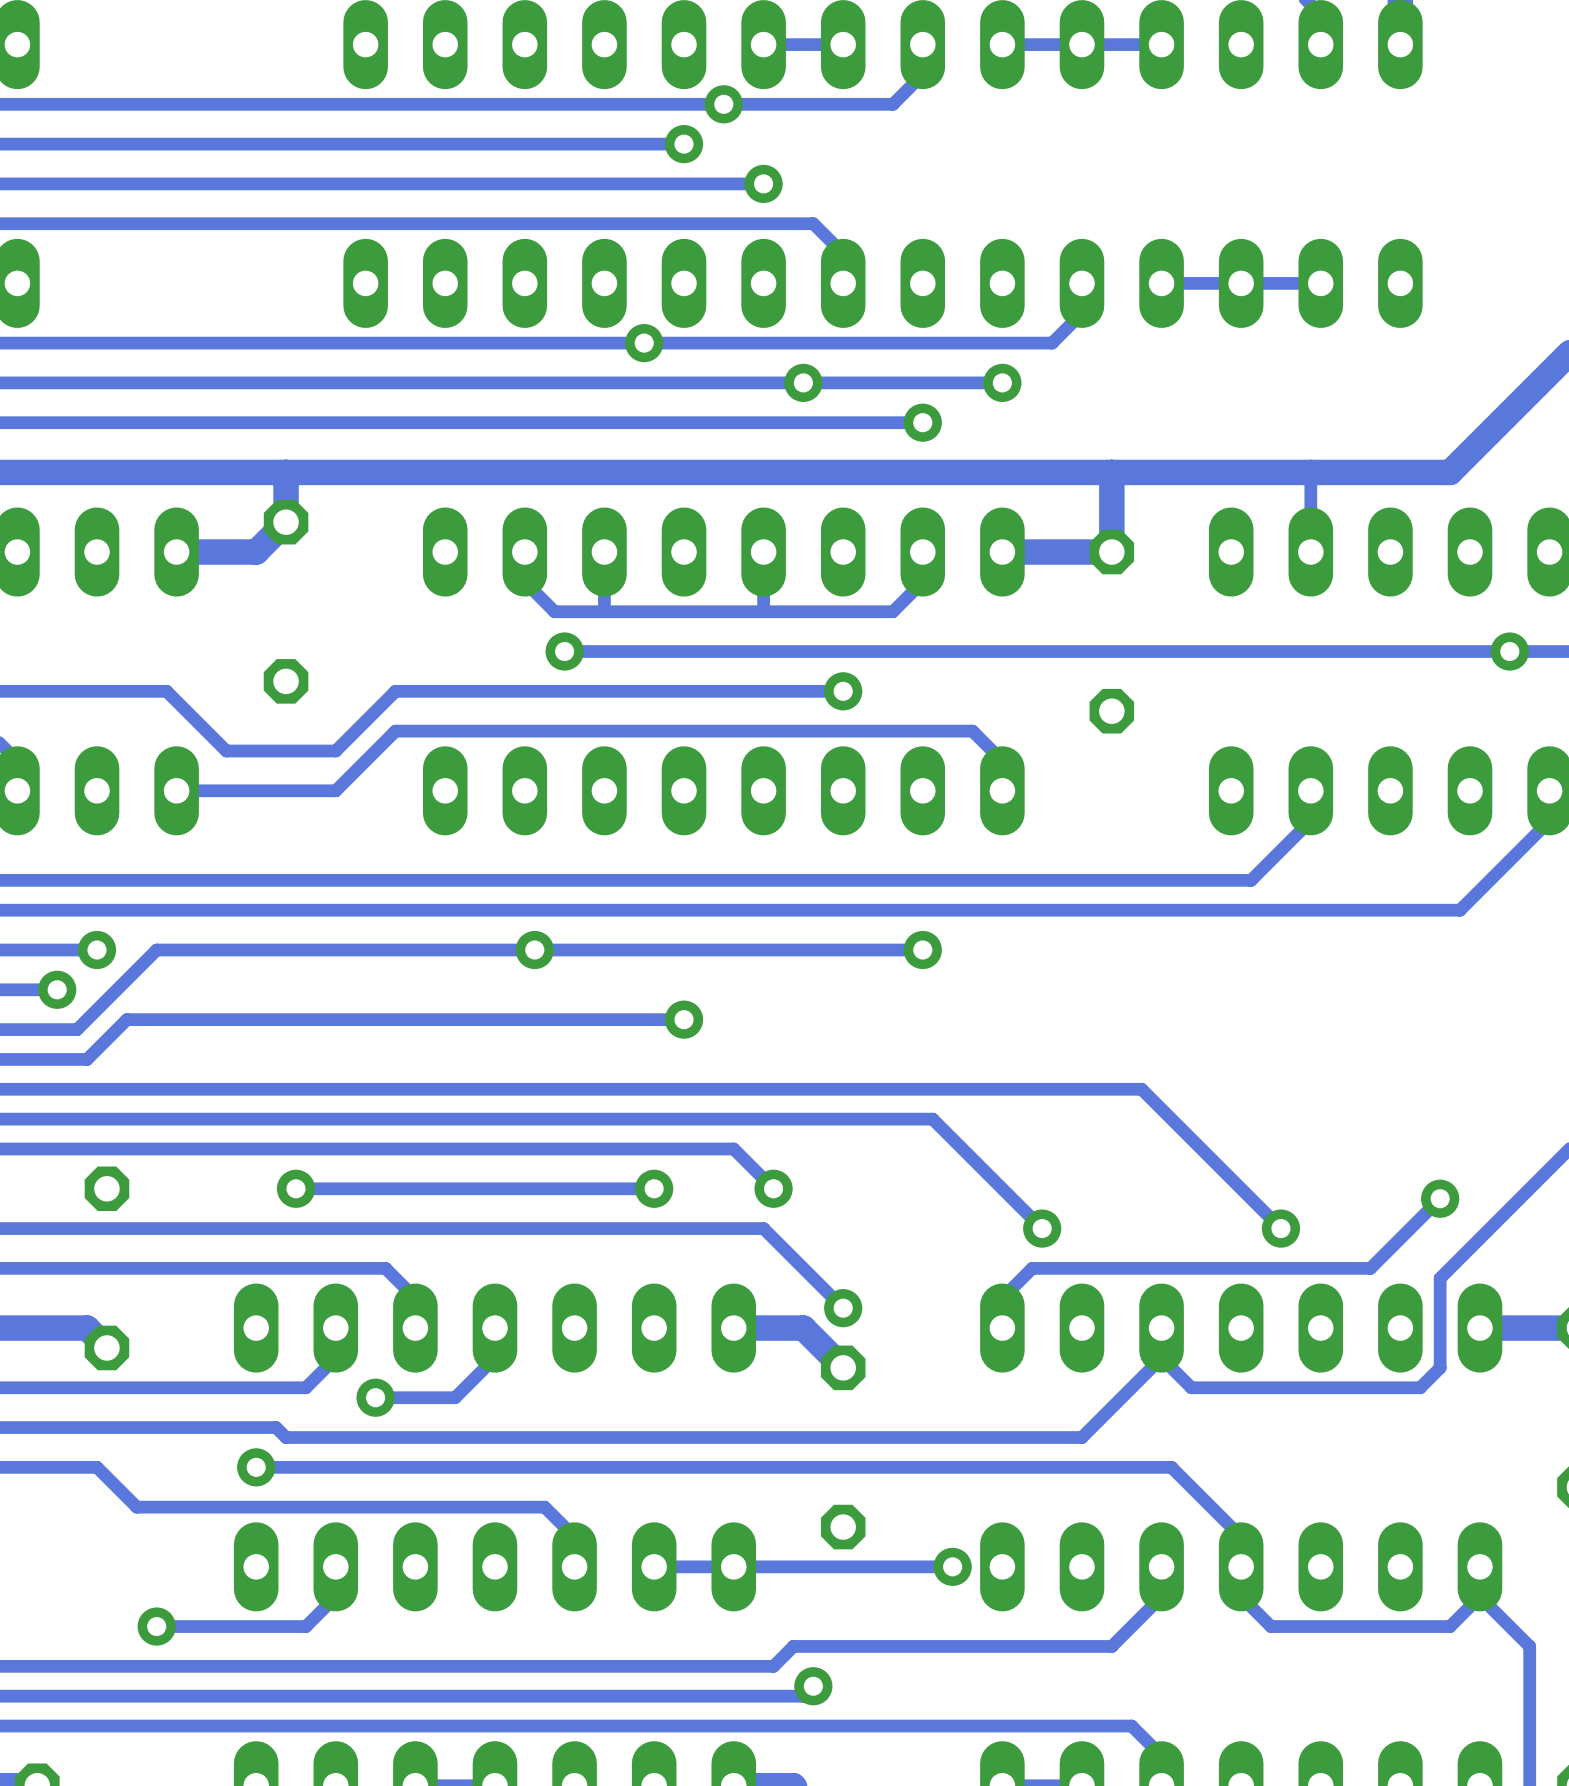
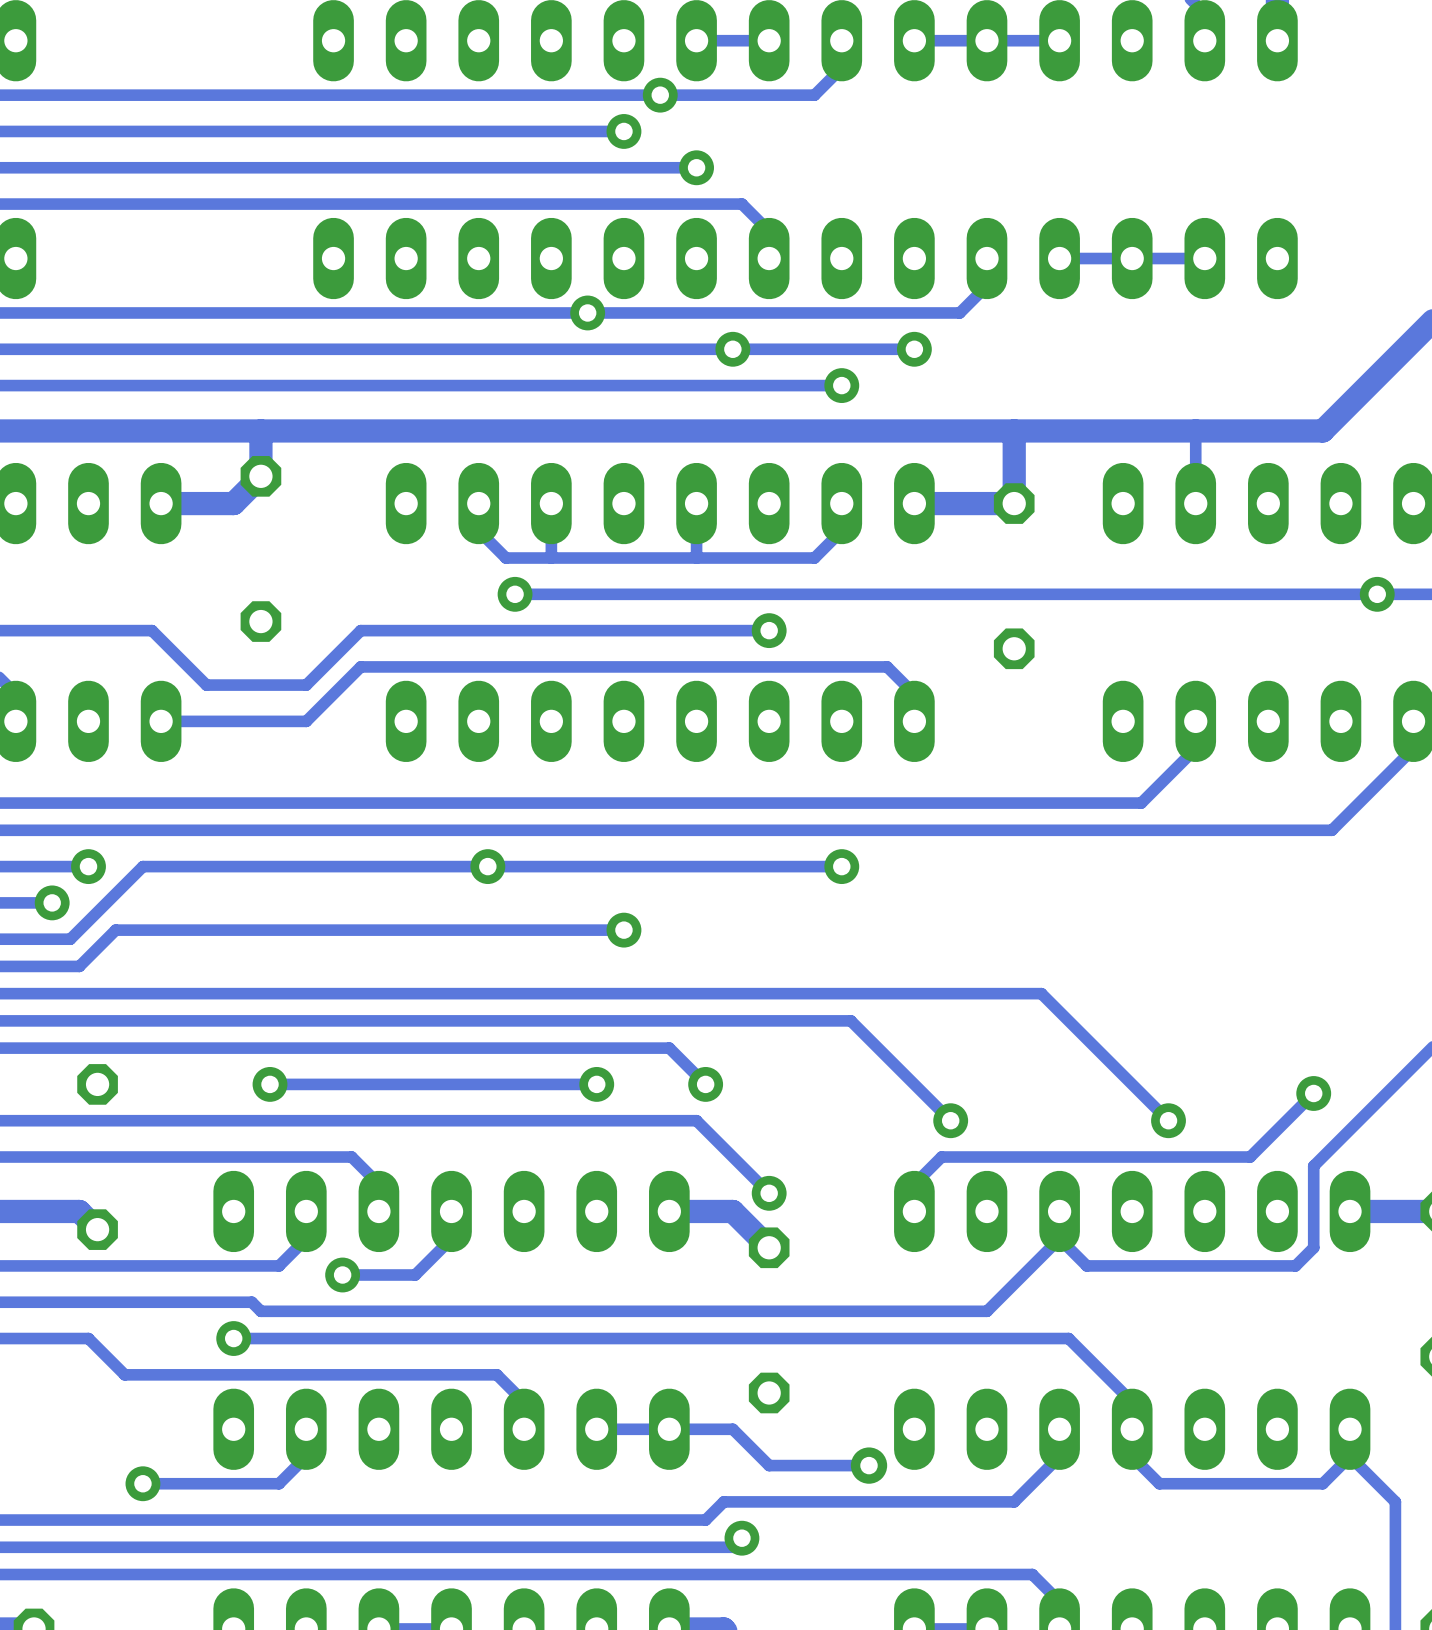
track: (952, 1566) (803, 1566) -> (869, 1465) (769, 1465) (732, 1429)
via: (952, 1566) -> none
via: none -> (869, 1465)

